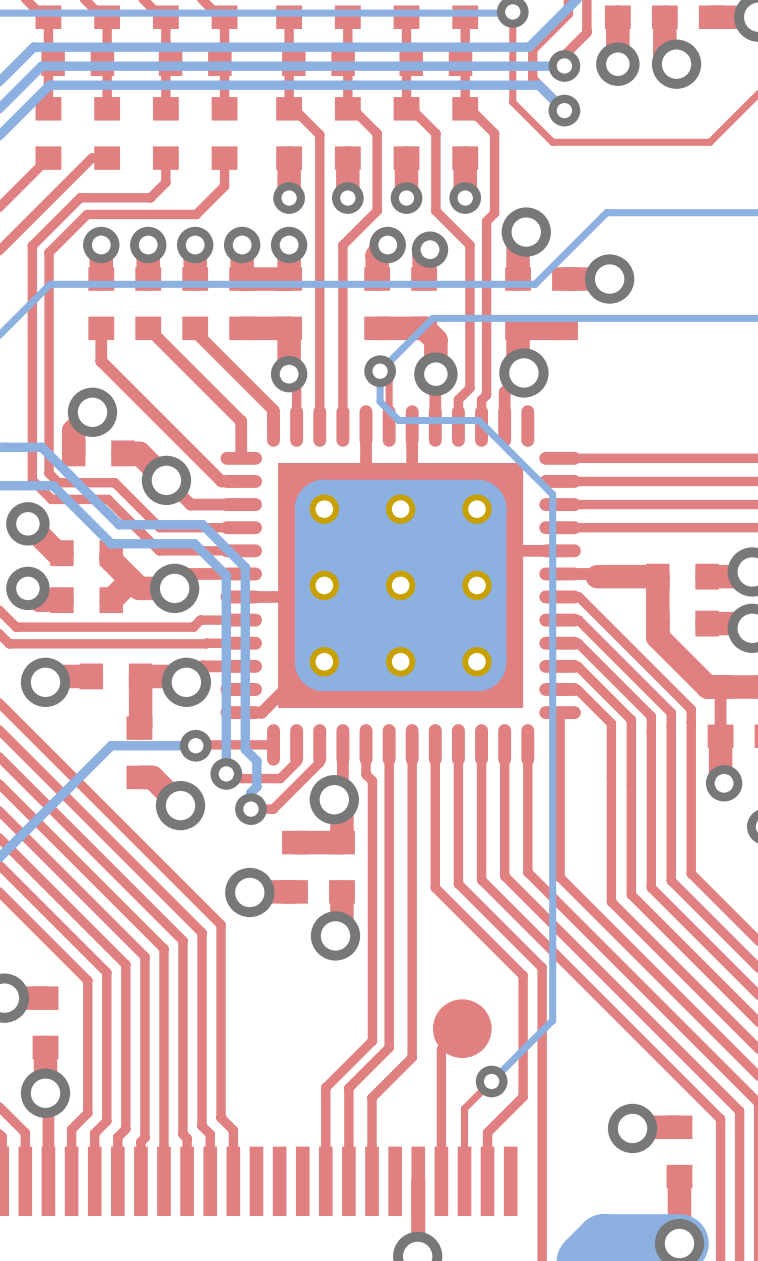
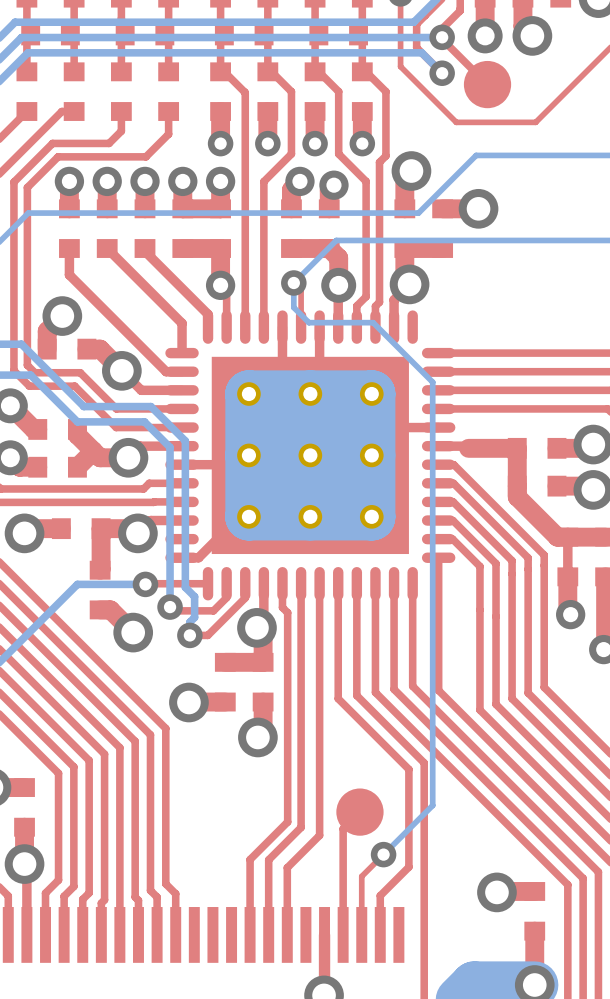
top track: none -> (442, 37) (487, 84)
part: none -> (487, 84)
top track: (710, 142) (552, 142) -> (559, 98) (535, 122) (456, 122) (432, 98)

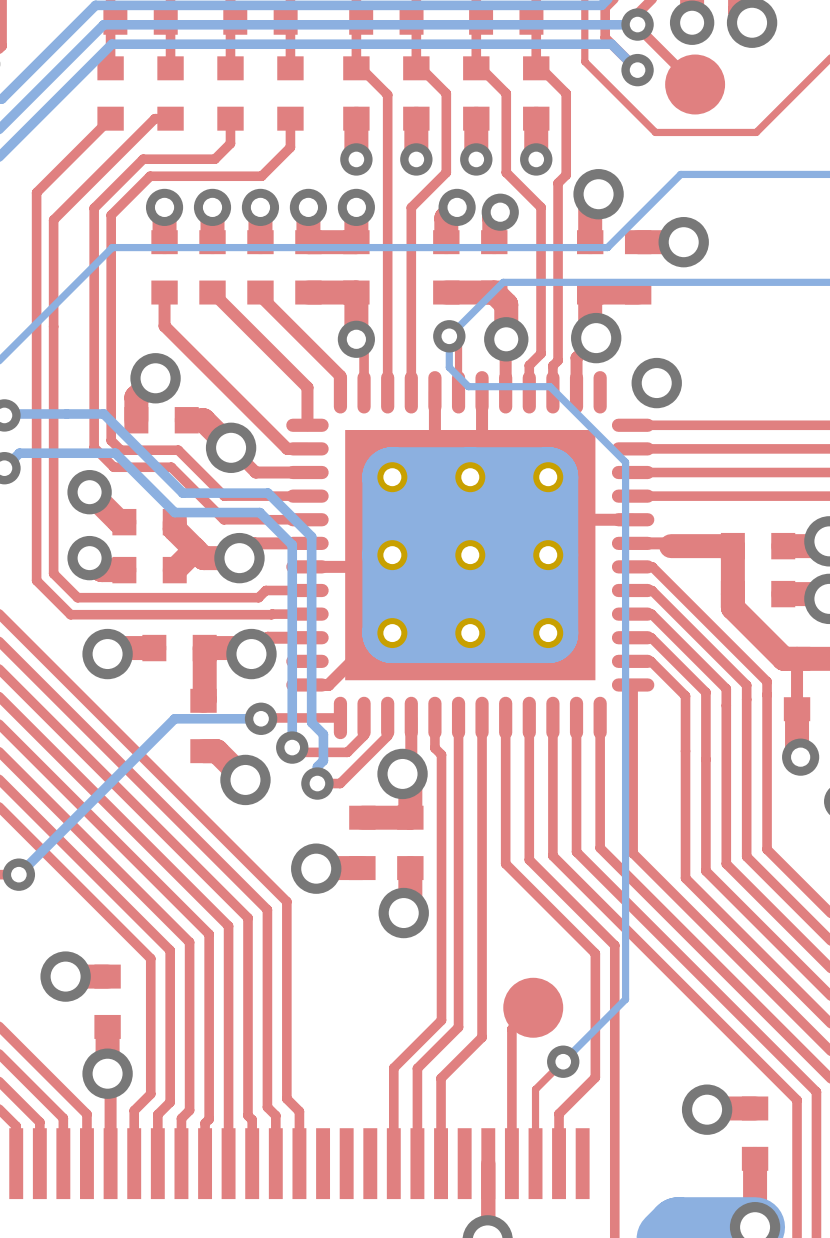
via: none -> (656, 383)

